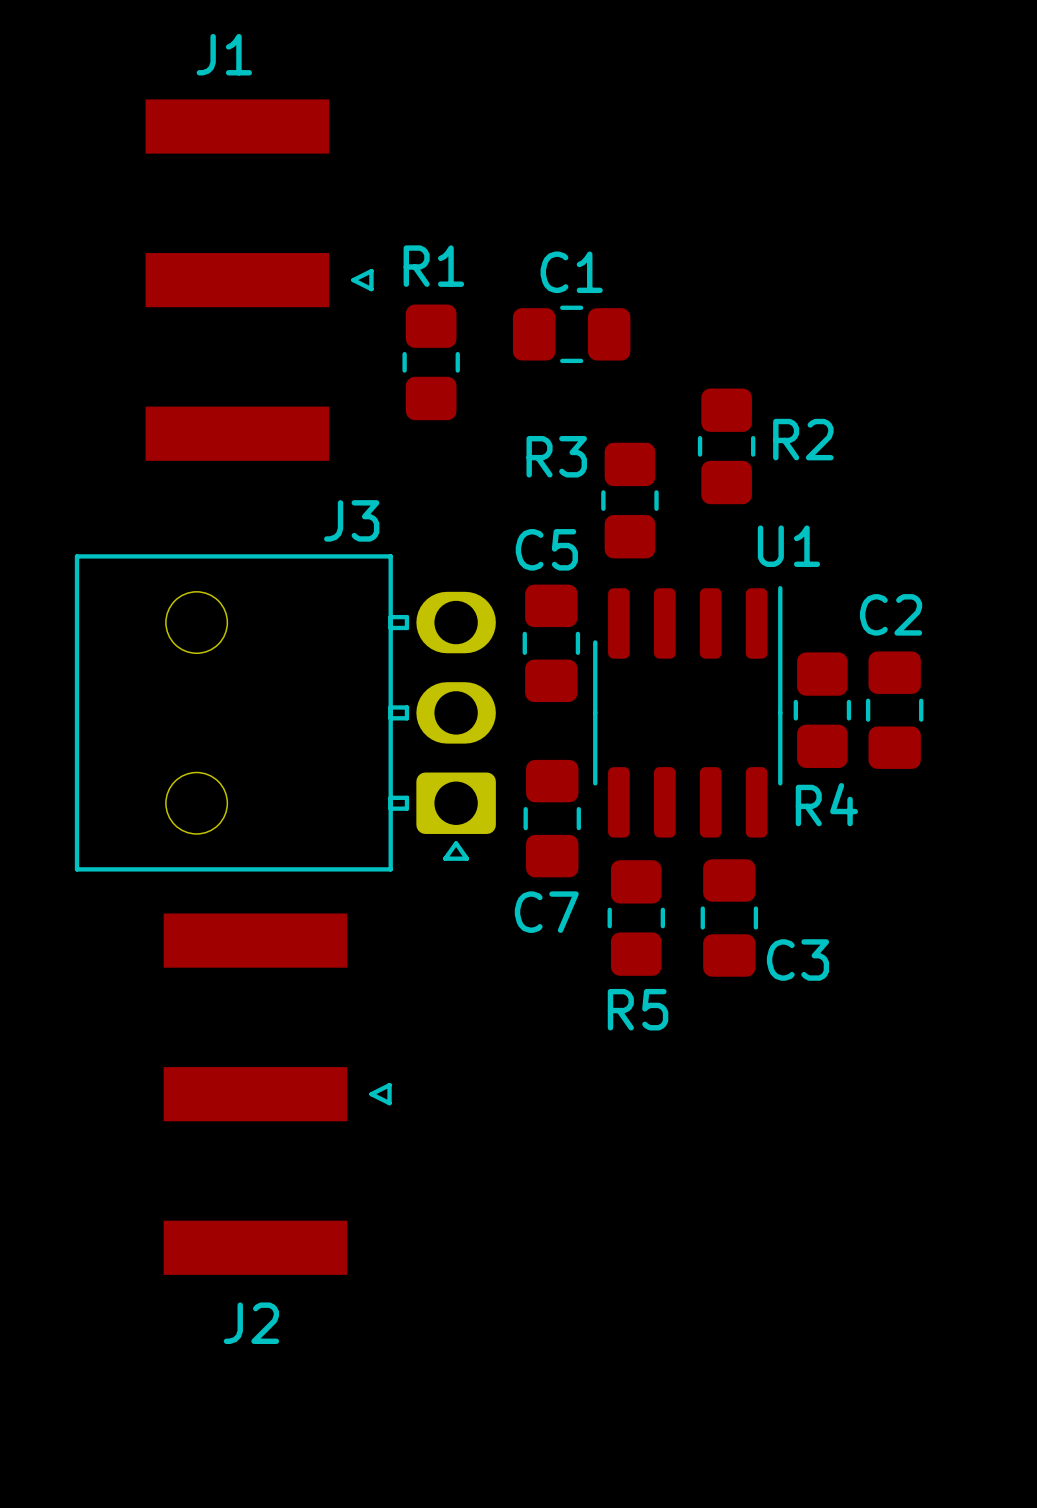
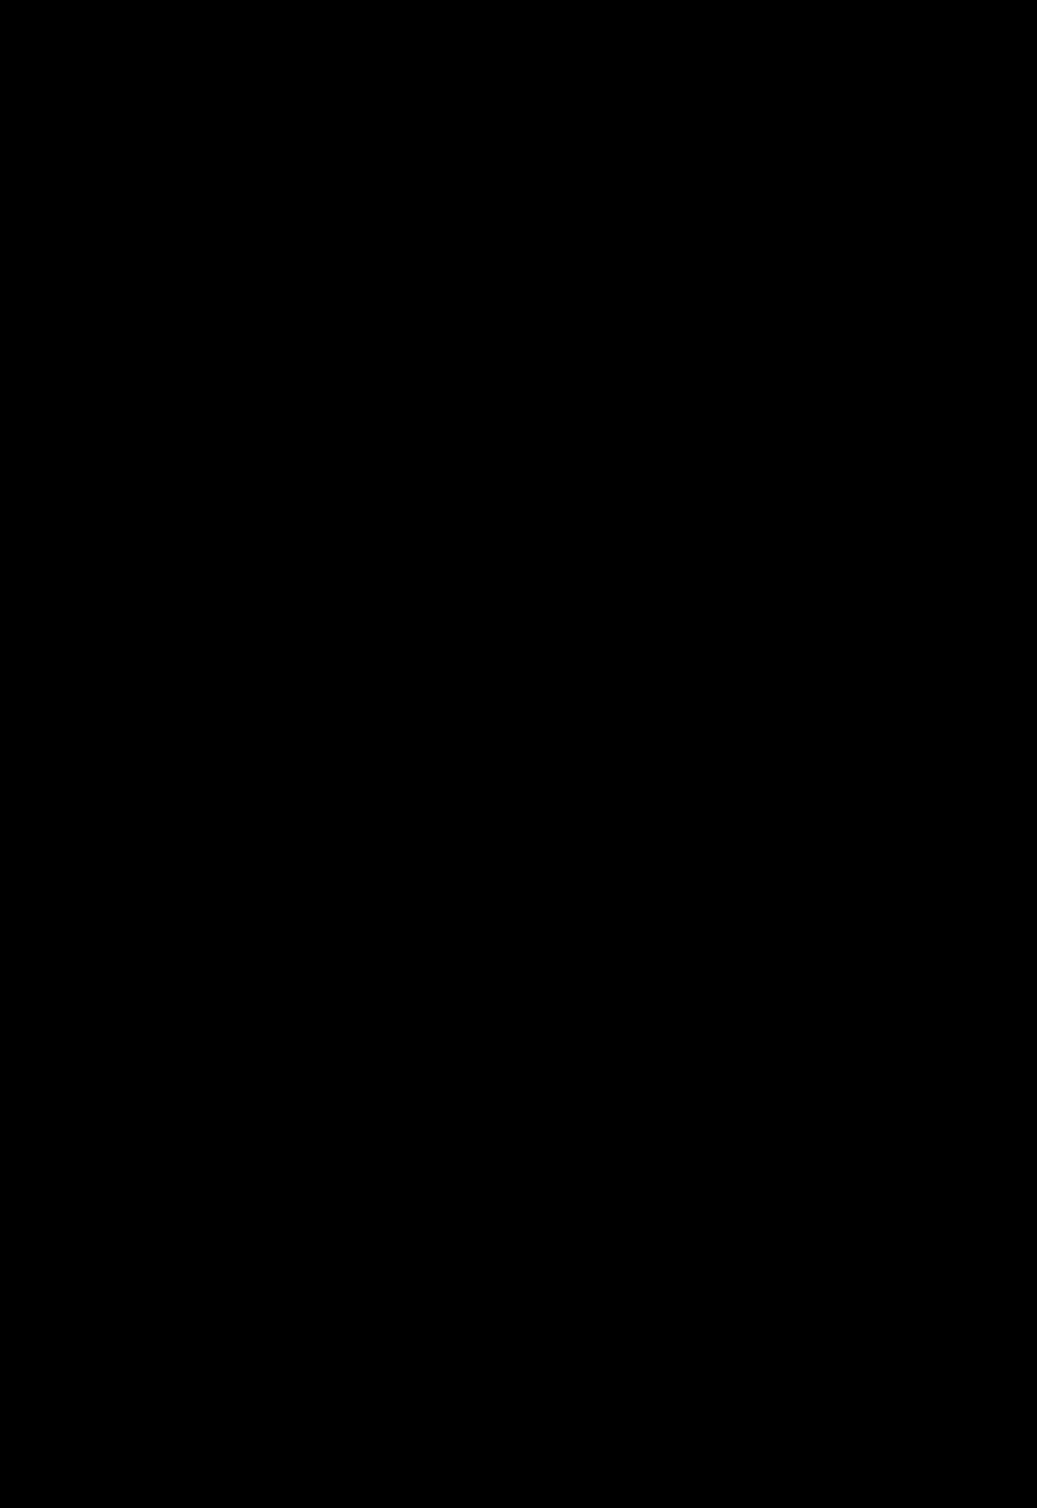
J1: (259, 280) -> none
C1: (571, 334) -> none
R1: (431, 362) -> none
R2: (726, 446) -> none
R3: (629, 500) -> none
C5: (551, 643) -> none
R4: (822, 710) -> none
C2: (894, 710) -> none
U1: (687, 711) -> none
J3: (285, 712) -> none
C7: (552, 818) -> none
R5: (636, 917) -> none
C3: (729, 917) -> none
J2: (277, 1094) -> none

